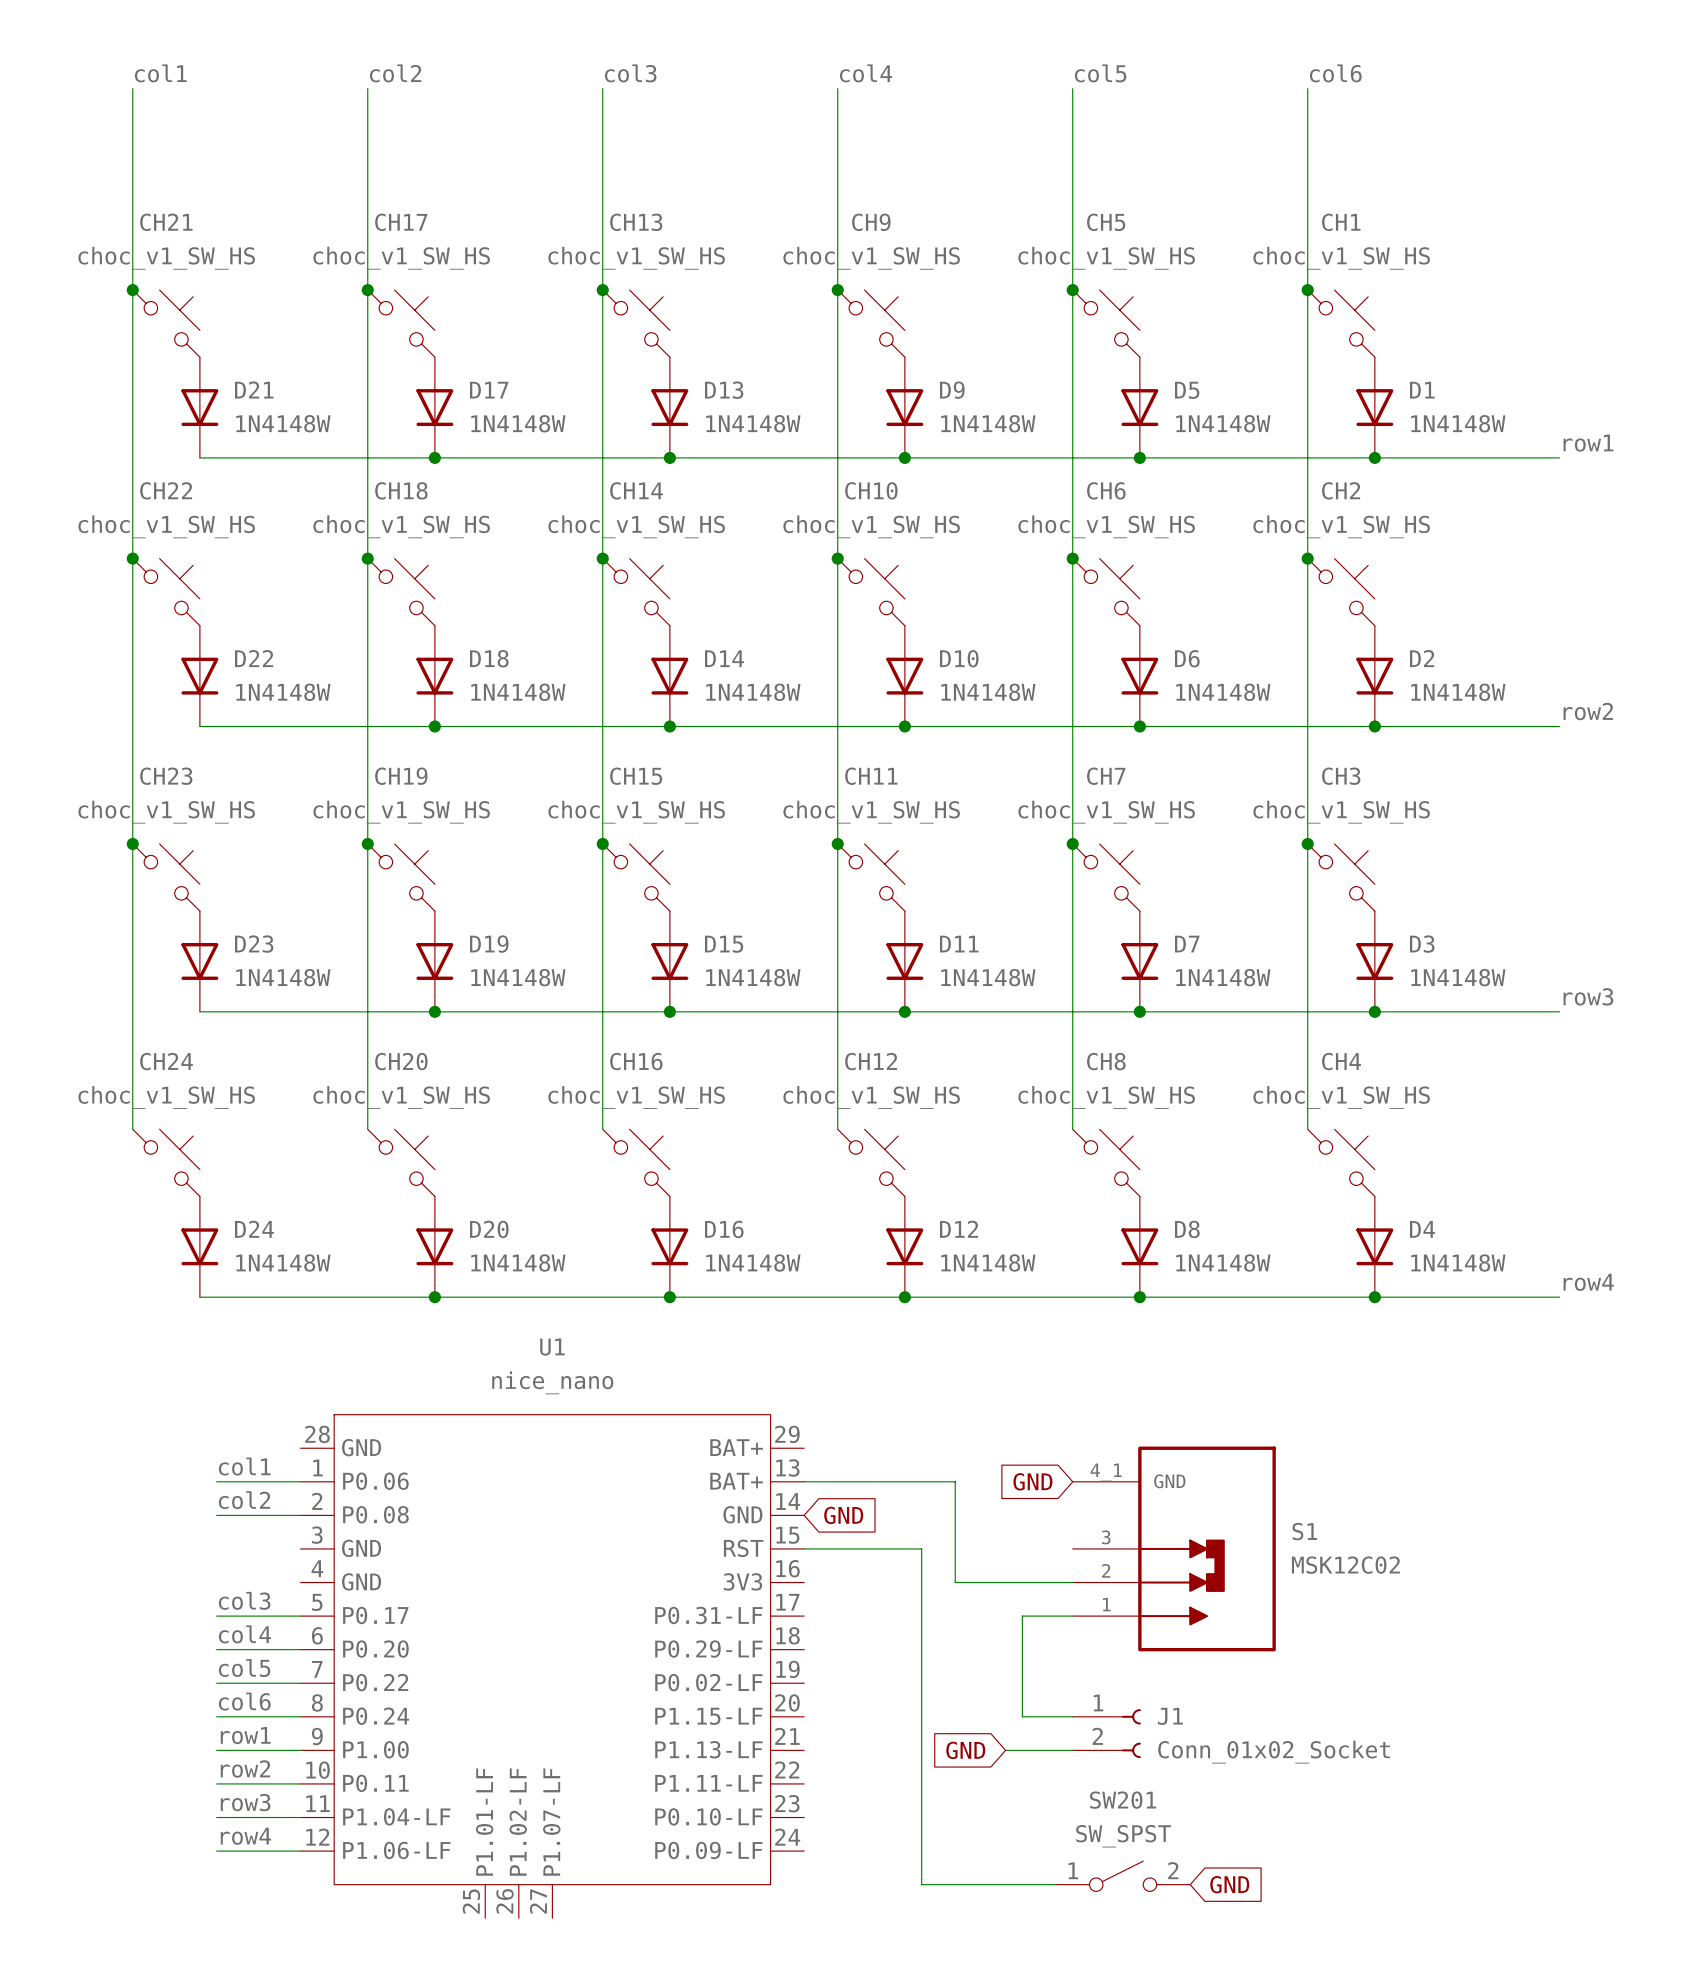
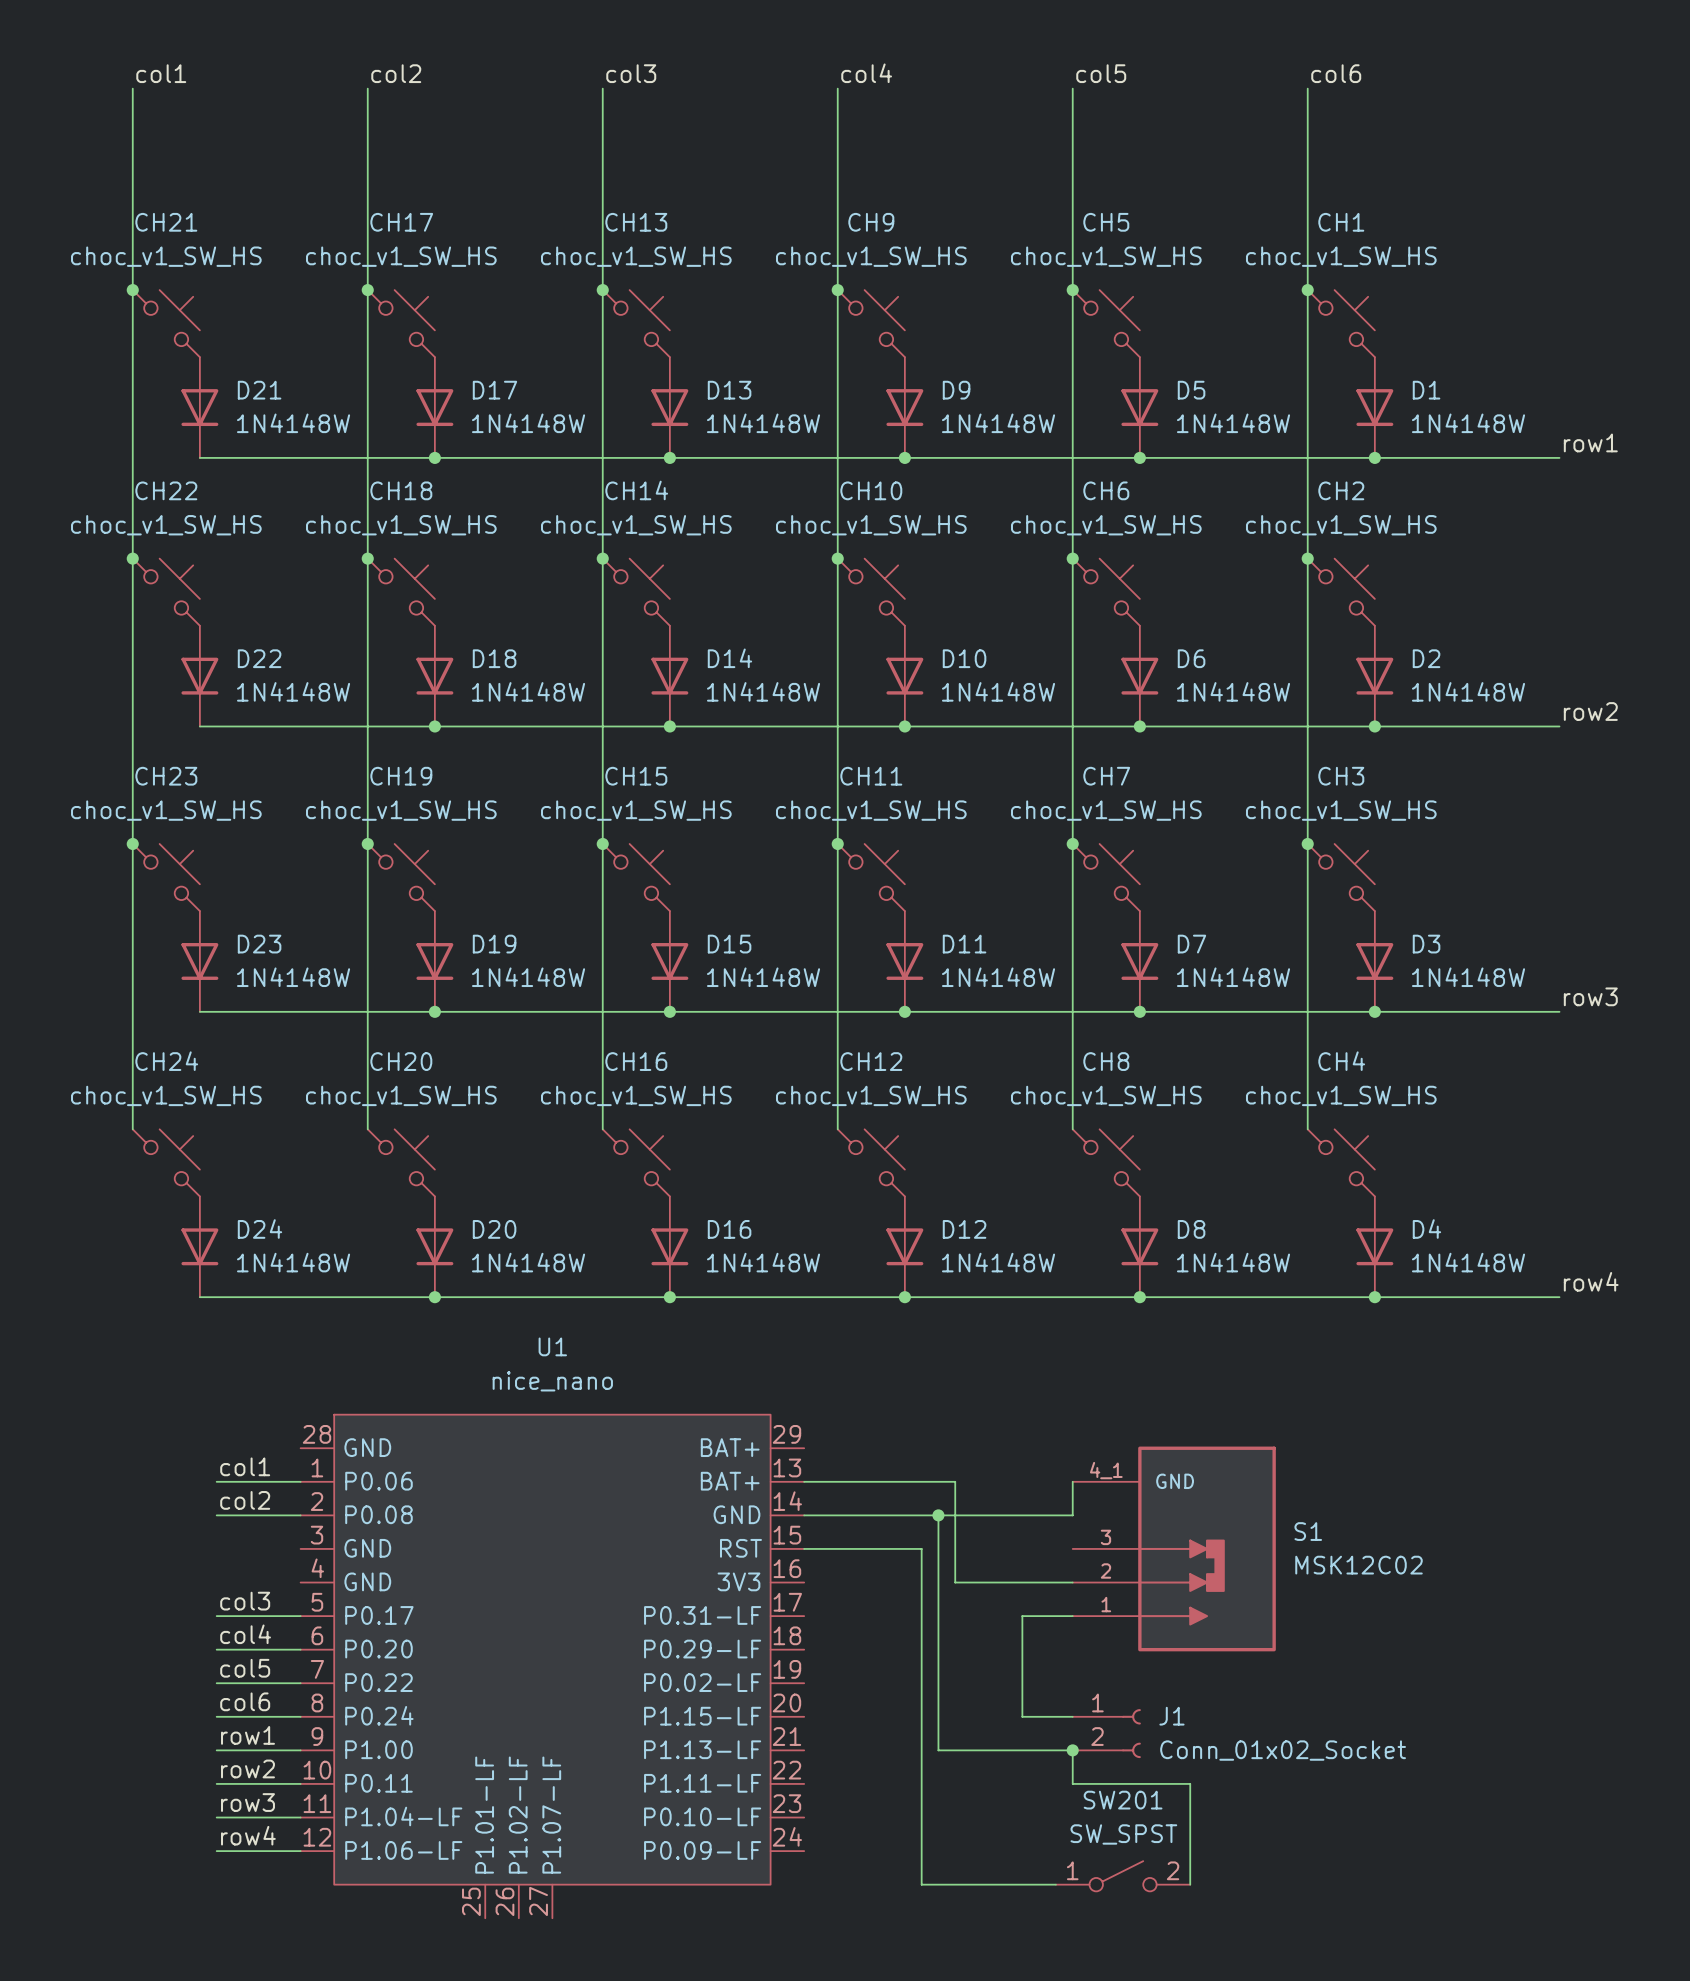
global label: GND (1032, 1481) -> none
wire: none -> (1072, 1481) (1072, 1515) (804, 1515)
global label: GND (843, 1515) -> none
wire: none -> (938, 1515) (938, 1750) (1005, 1750)
junction: none -> (938, 1515)
global label: GND (965, 1750) -> none
wire: none -> (1072, 1750) (1072, 1783) (1190, 1783) (1190, 1884)
junction: none -> (1072, 1750)
global label: GND (1229, 1884) -> none

